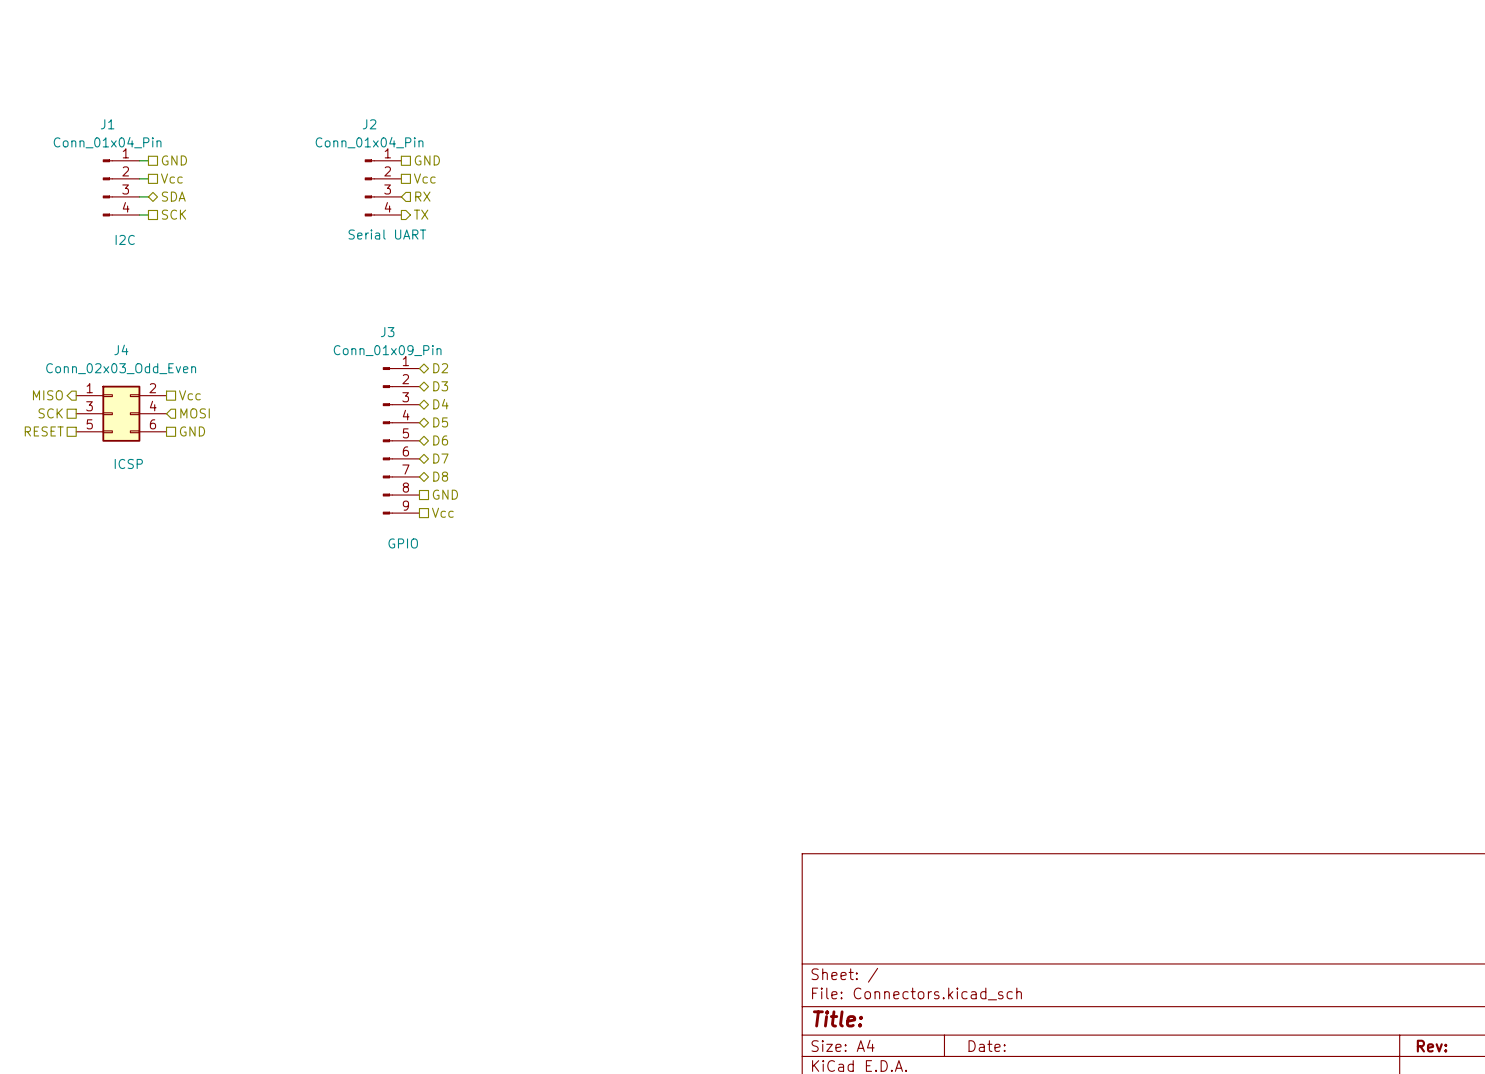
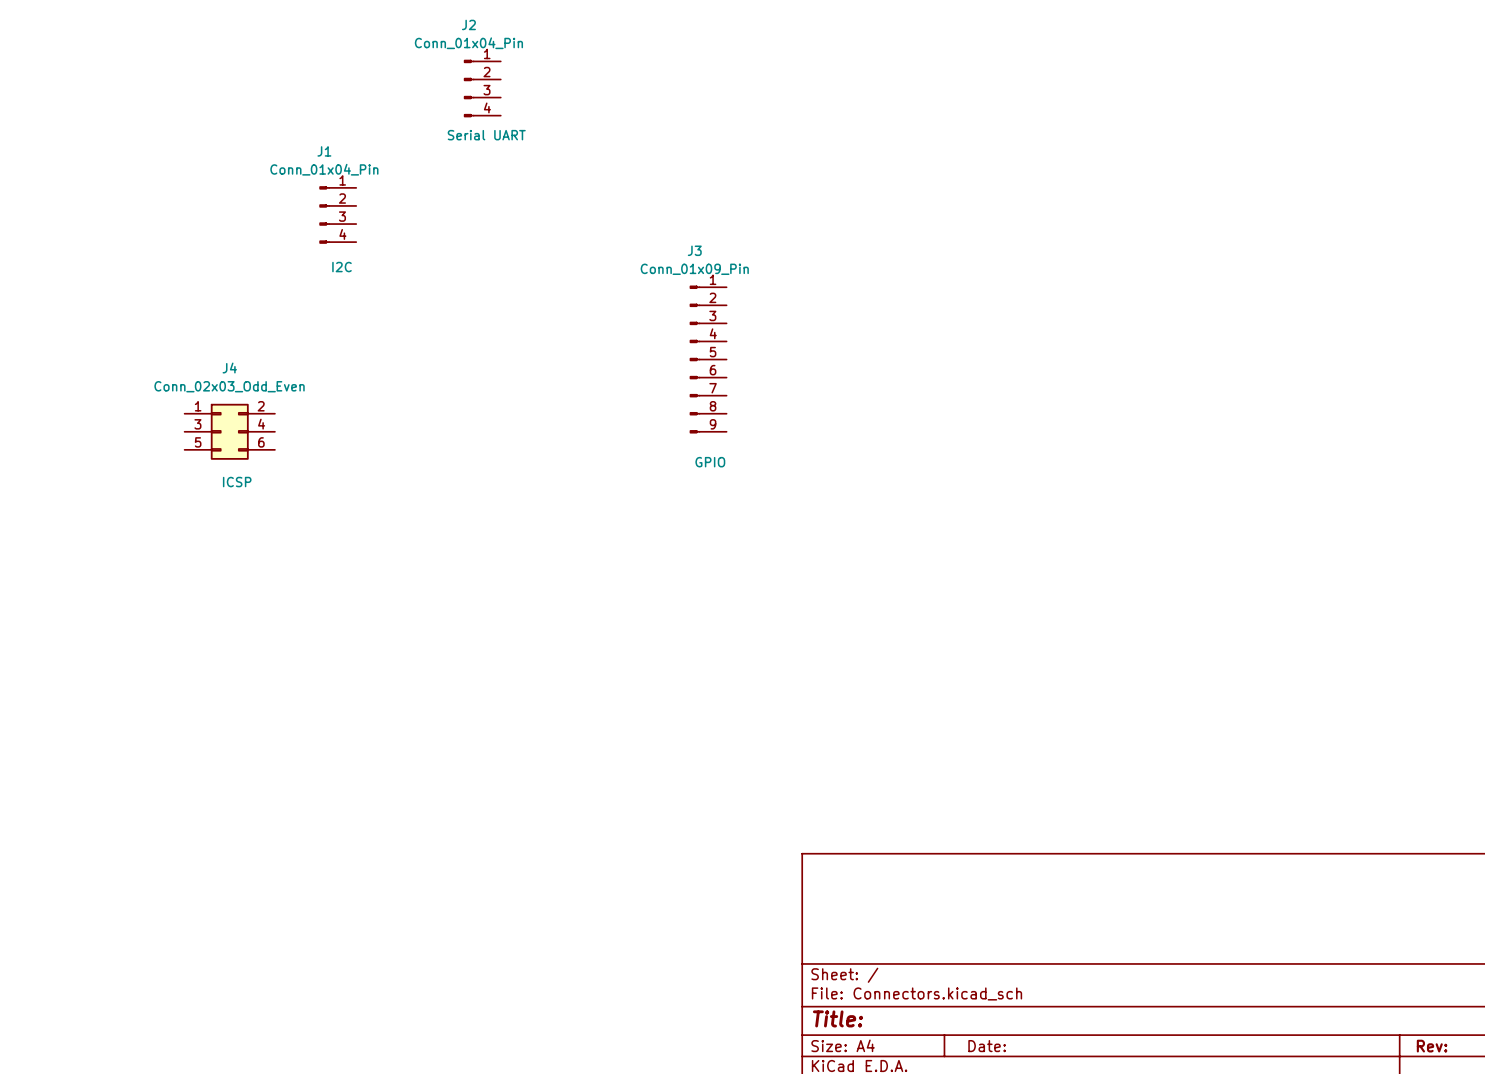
wire: (139, 160) (148, 160) -> none
hierarchical label: GND (174, 160) -> none
hierarchical label: GND (427, 160) -> none
wire: (139, 178) (148, 178) -> none
hierarchical label: Vcc (171, 178) -> none
hierarchical label: Vcc (424, 178) -> none
J1 position: (121, 187) -> (337, 214)
J2 position: (383, 187) -> (482, 88)
wire: (139, 196) (148, 196) -> none
hierarchical label: SDA (173, 196) -> none
hierarchical label: RX (422, 196) -> none
wire: (139, 214) (148, 214) -> none
hierarchical label: SCK (173, 214) -> none
hierarchical label: TX (421, 214) -> none
hierarchical label: D2 (440, 368) -> none
hierarchical label: D3 (440, 386) -> none
hierarchical label: MISO (47, 395) -> none
hierarchical label: Vcc (189, 395) -> none
hierarchical label: D4 (440, 404) -> none
hierarchical label: SCK (50, 413) -> none
J4 position: (121, 413) -> (229, 431)
hierarchical label: MOSI (195, 413) -> none
hierarchical label: D5 (440, 422) -> none
hierarchical label: RESET (44, 431) -> none
hierarchical label: GND (192, 431) -> none
J3 position: (401, 440) -> (708, 359)
hierarchical label: D6 (440, 440) -> none
hierarchical label: D7 (440, 458) -> none
hierarchical label: D8 (440, 476) -> none
hierarchical label: GND (445, 494) -> none
hierarchical label: Vcc (442, 512) -> none

